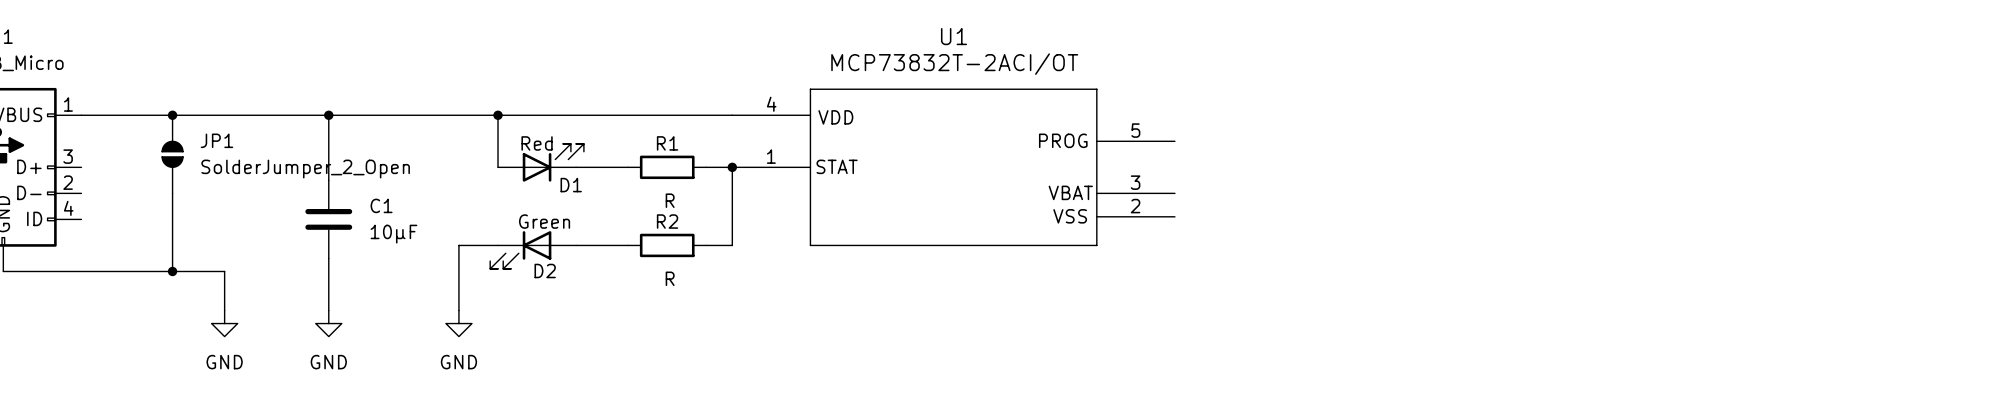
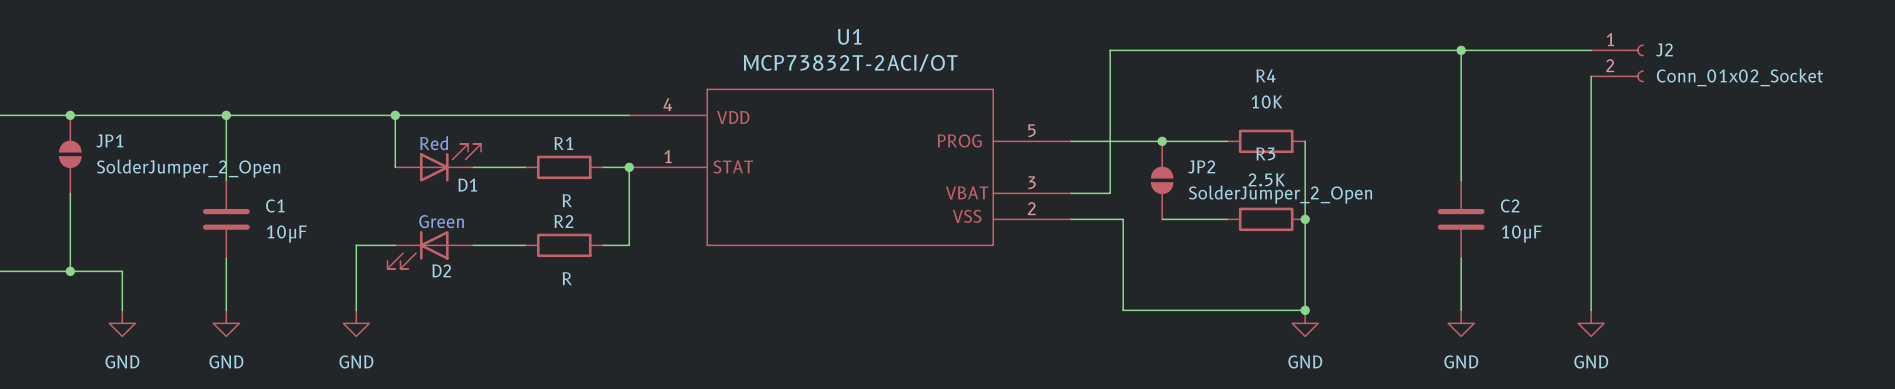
wire: none -> (1461, 50) (1461, 180)
junction: none -> (1461, 50)
wire: none -> (1591, 50) (1110, 50) (1110, 193) (1071, 193)
J2: none -> Conn_01x02_Socket (1617, 63)
wire: none -> (1591, 76) (1591, 310)
U1 symbol: [732, 88, 1175, 247] -> [629, 88, 1072, 247]
wire: none -> (1071, 141) (1227, 141)
junction: none -> (1162, 141)
R4: none -> 10K (1266, 141)
wire: none -> (1305, 141) (1305, 310) (1123, 310) (1123, 219) (1071, 219)
JP2: none -> SolderJumper_2_Open (1162, 180)
wire: none -> (1162, 219) (1227, 219)
R3: none -> 2.5K (1266, 219)
junction: none -> (1305, 219)
C2: none -> 10μF (1461, 219)
wire: none -> (1461, 258) (1461, 310)
junction: none -> (1305, 310)
power symbol: none -> GND (1305, 323)
power symbol: none -> GND (1461, 323)
power symbol: none -> GND (1591, 323)

